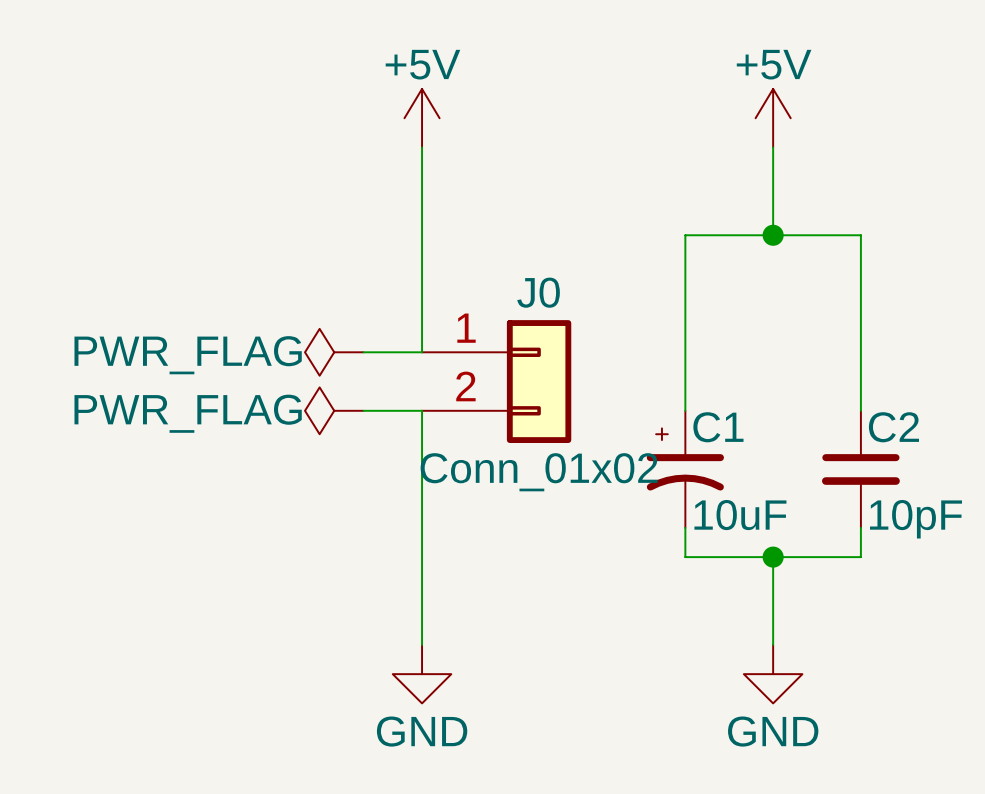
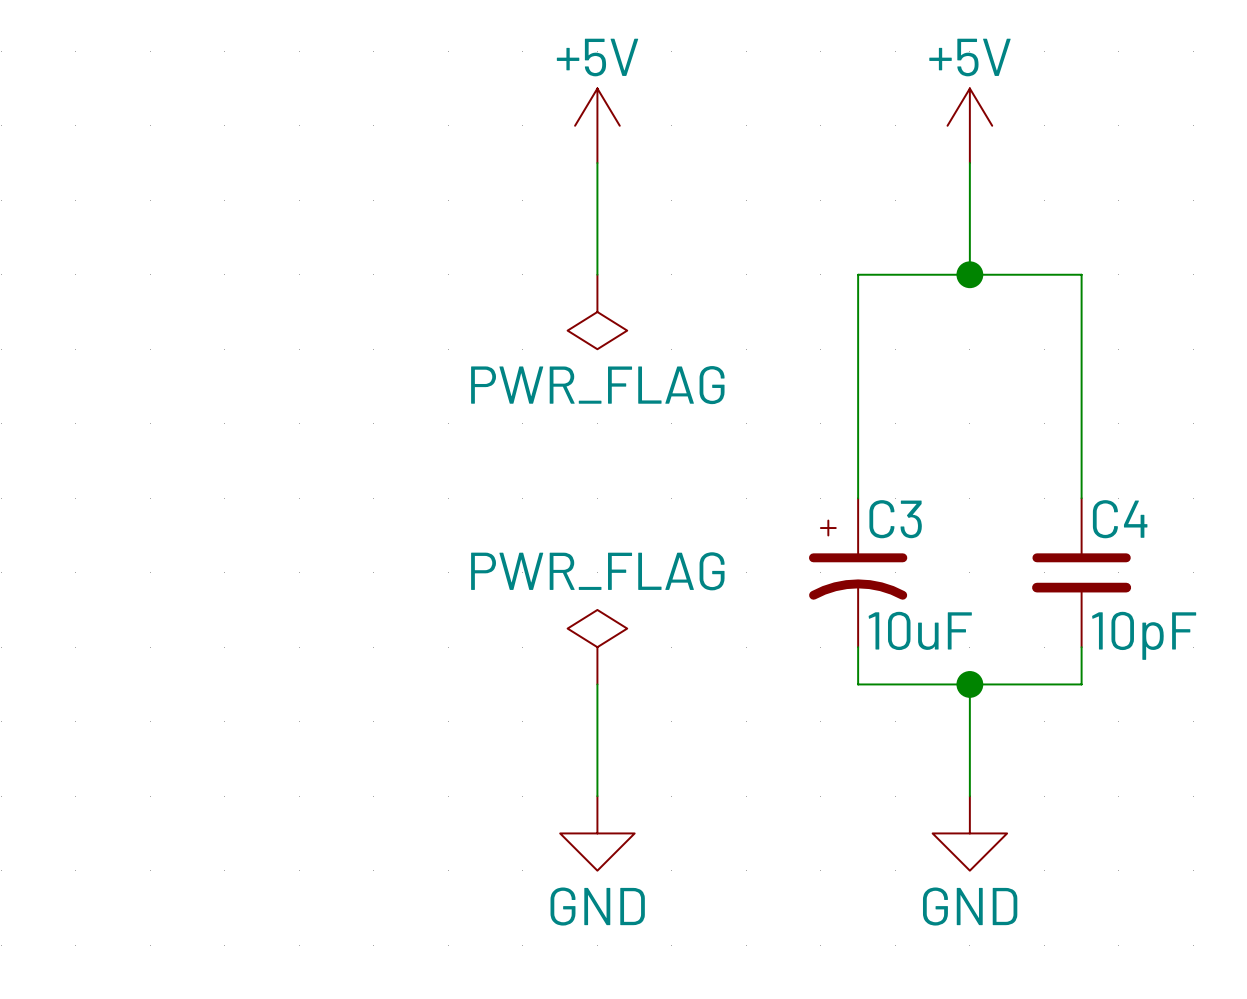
power symbol position: +5V (422, 118) -> +5V (597, 125)
wire: (422, 147) (422, 352) (363, 352) -> none
wire: none -> (597, 163) (597, 274)
power symbol: none -> PWR_FLAG (597, 311)
power symbol: PWR_FLAG (334, 352) -> none
J0: Conn_01x02 (496, 381) -> none
power symbol: PWR_FLAG (334, 410) -> none
wire: (363, 410) (422, 410) (422, 644) -> none
C1 name: C1 (718, 427) -> C3 (895, 519)
C2 name: C2 (893, 427) -> C4 (1120, 519)
power symbol: none -> PWR_FLAG (597, 647)
wire: none -> (597, 684) (597, 796)
power symbol position: GND (422, 674) -> GND (597, 833)

